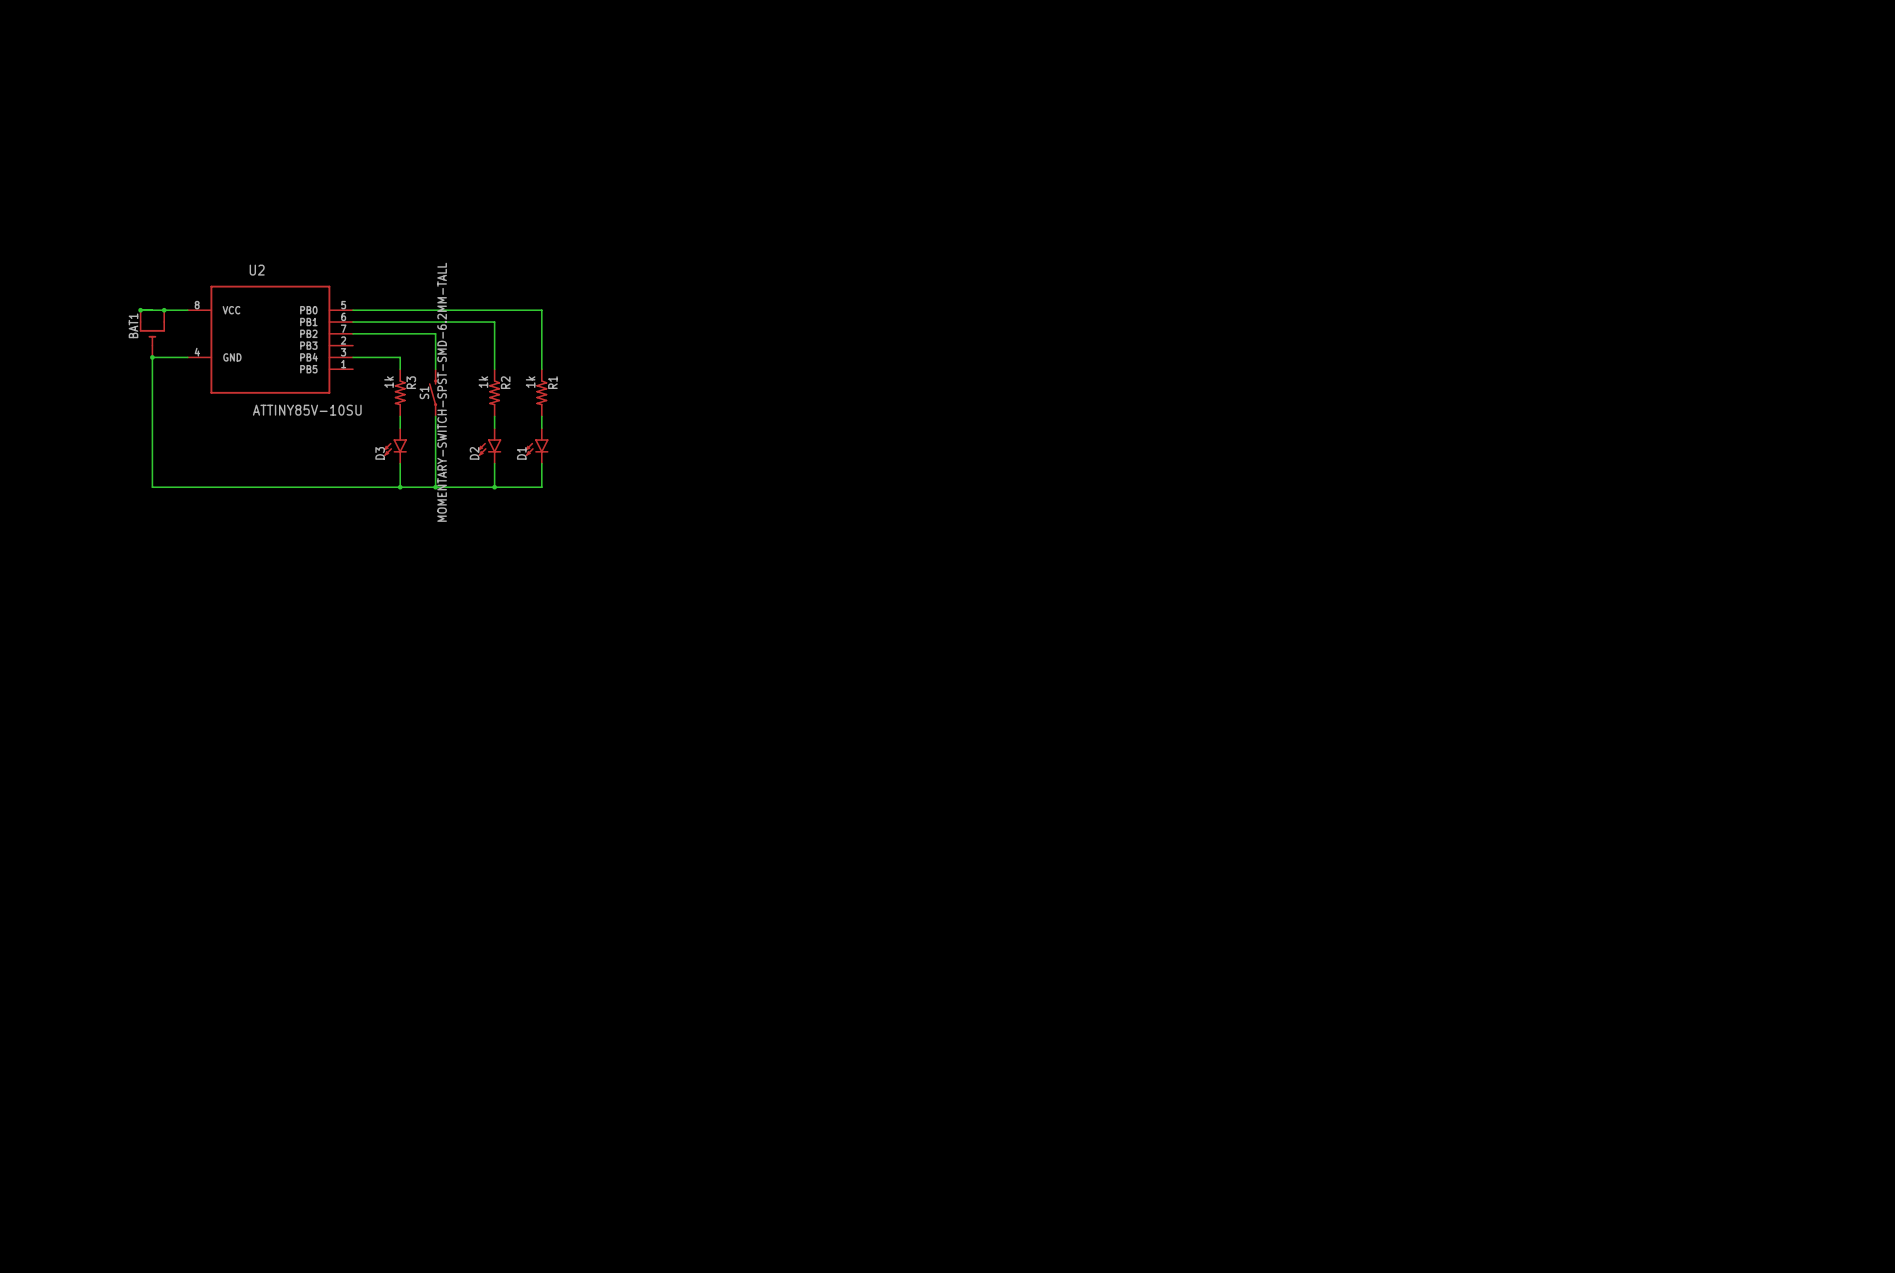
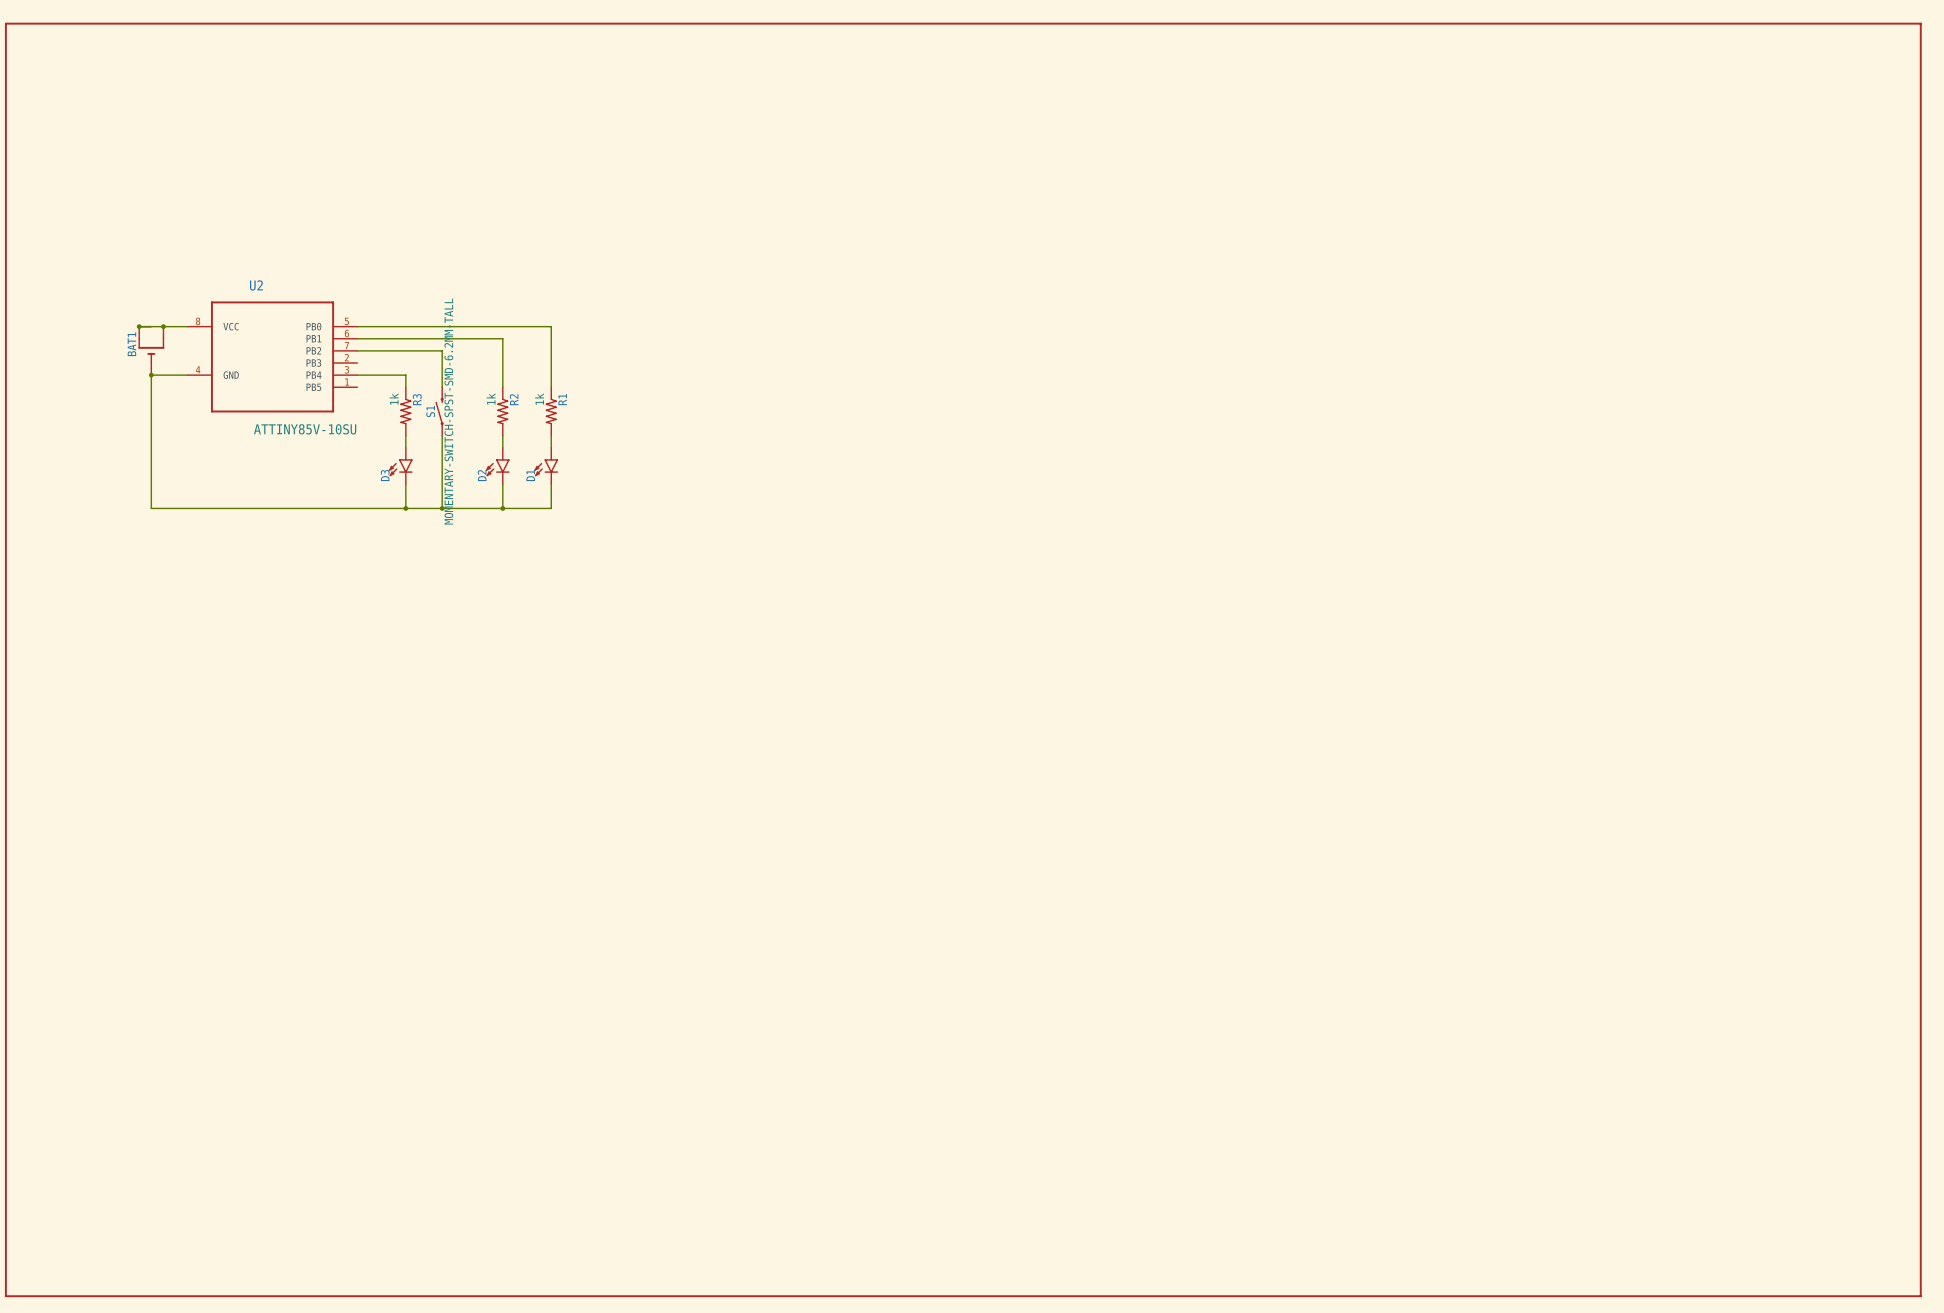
part: none -> (963, 659)

